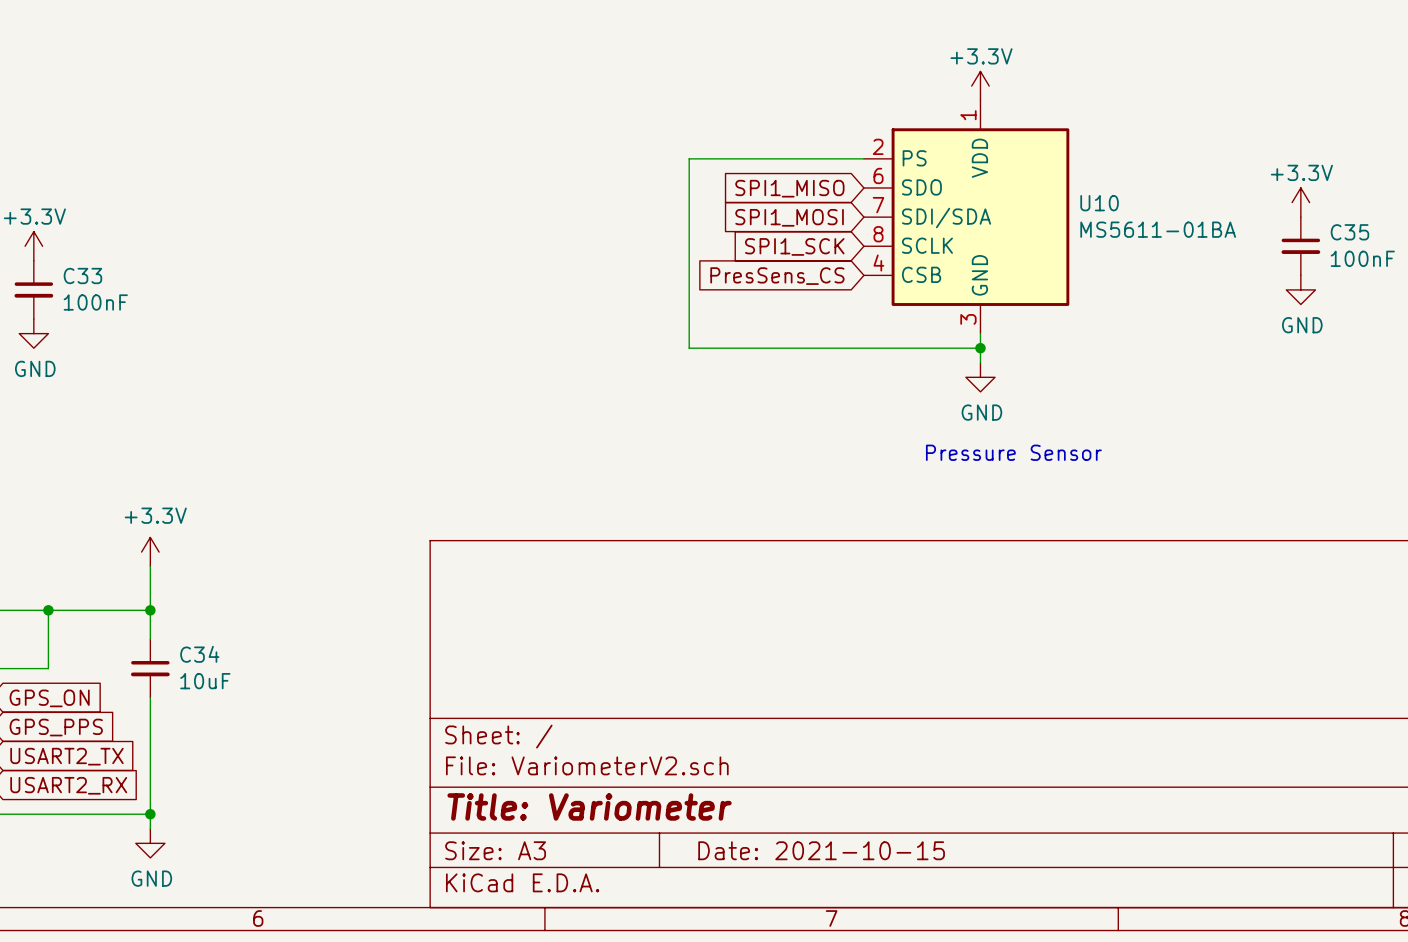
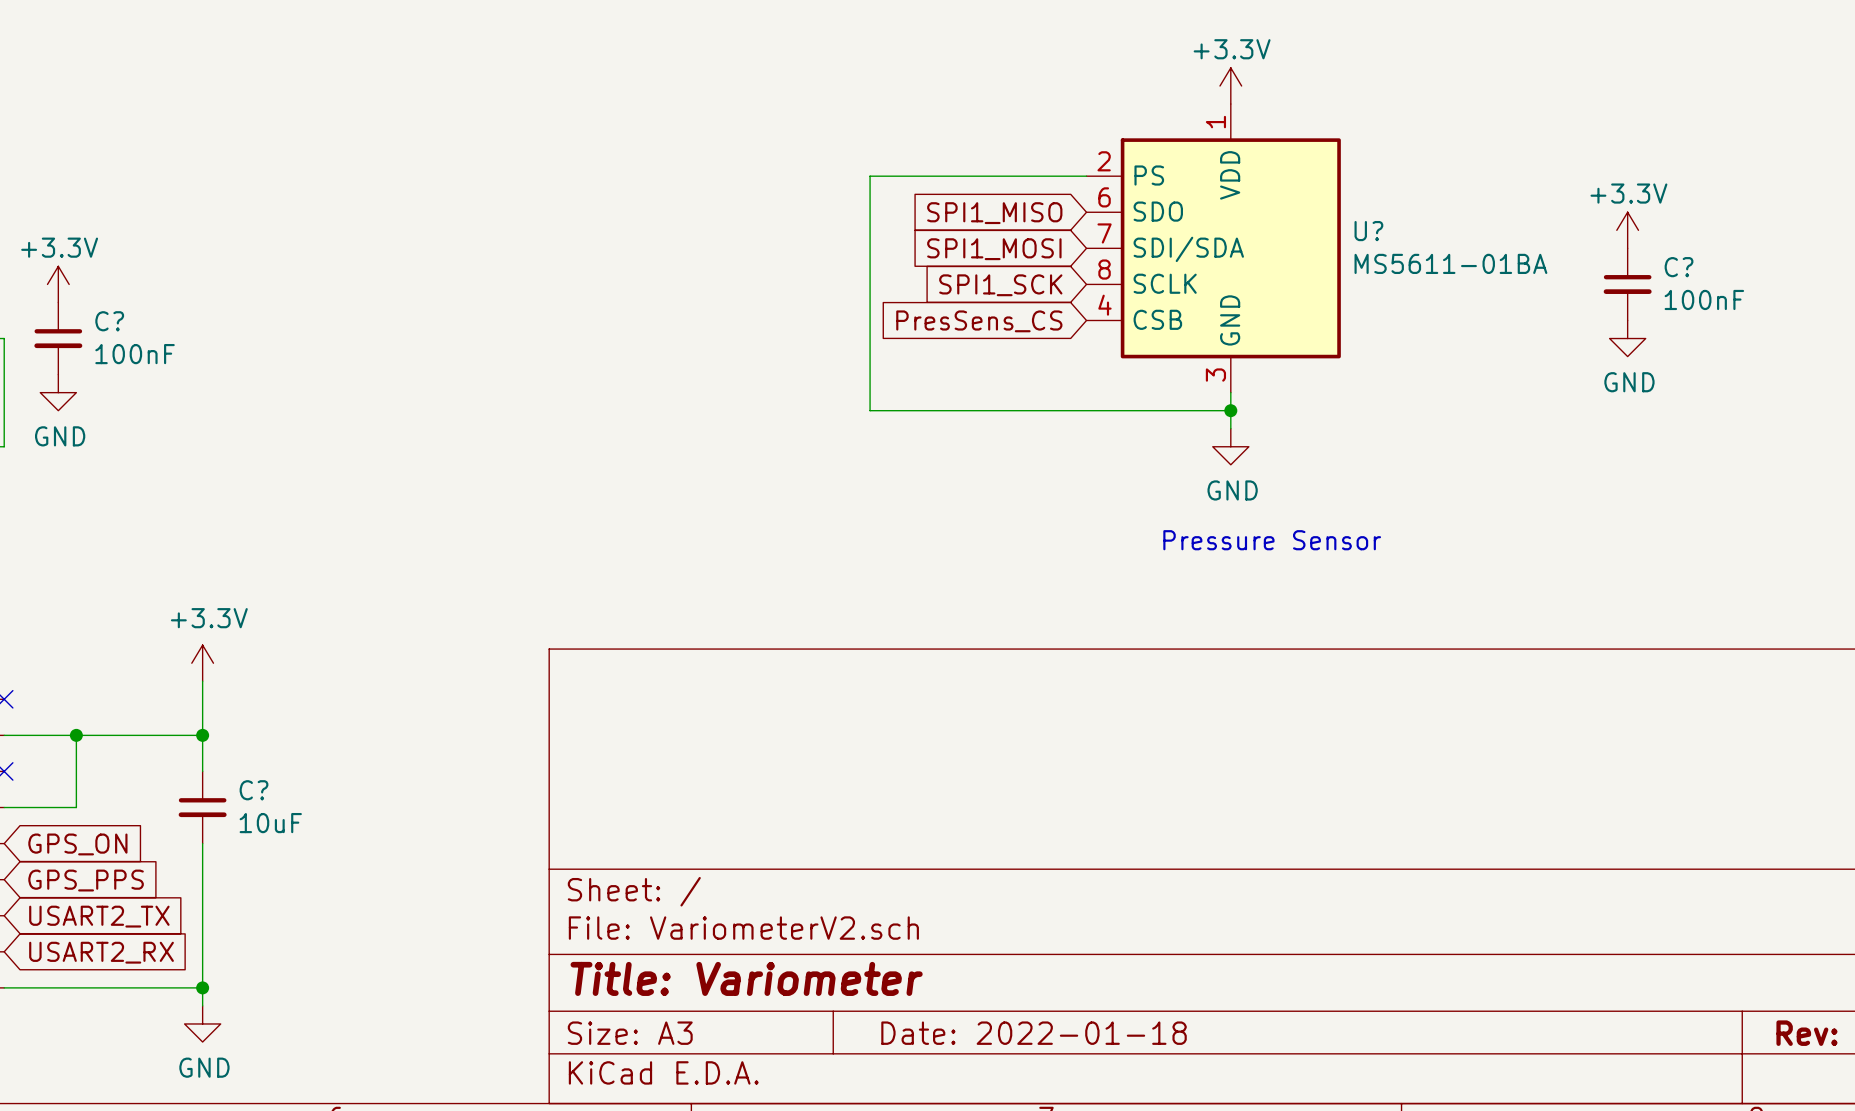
U10 name: U10 (1099, 203) -> U? (1368, 231)
C35 name: C35 (1349, 232) -> C? (1679, 267)
C33 name: C33 (82, 275) -> C? (109, 321)
C34 name: C34 (199, 654) -> C? (254, 790)
title block: Date: 2021-10-15 (821, 850) -> Date: 2022-01-18 (1034, 1033)

